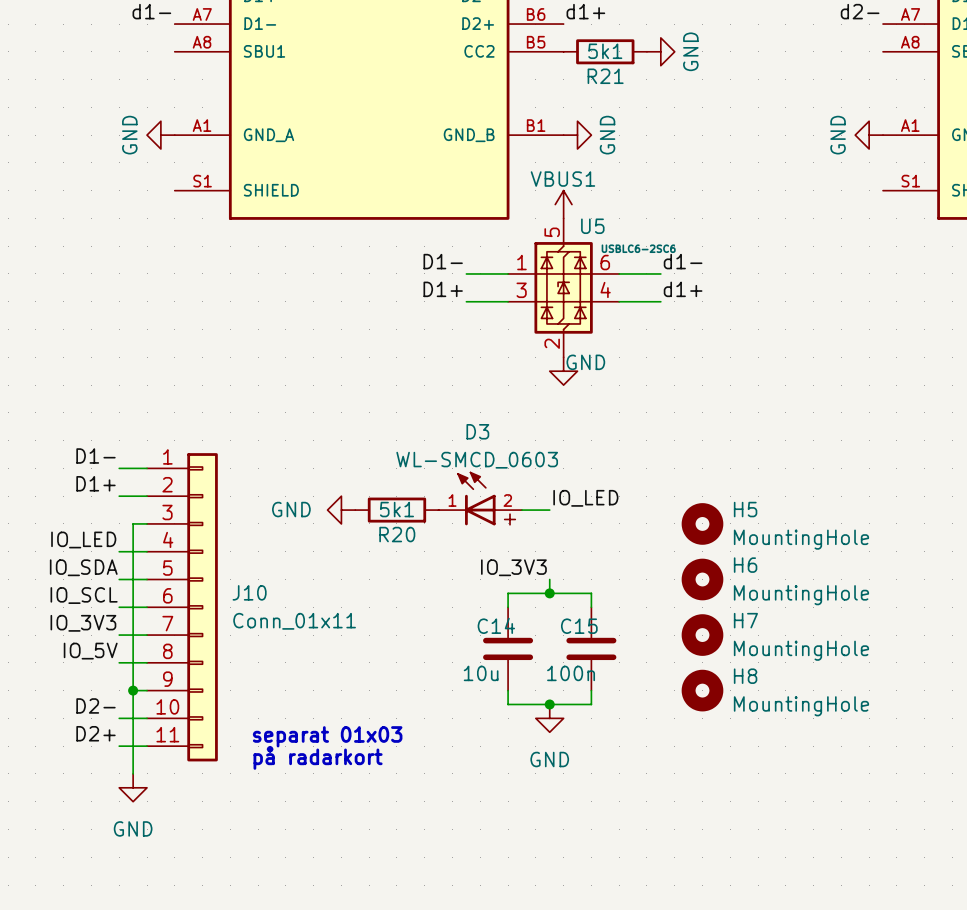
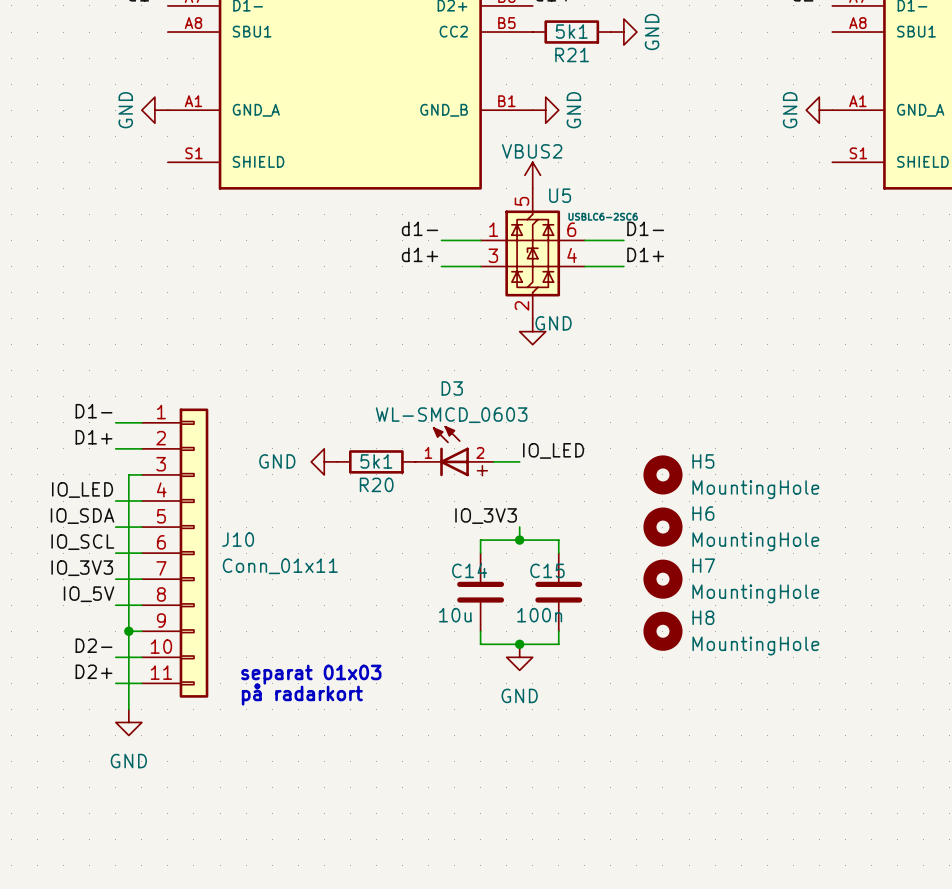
power symbol: VBUS1 (563, 204) -> VBUS2 (532, 175)
label: D1- (443, 261) -> d1- (420, 228)
label: d1- (683, 261) -> D1- (645, 228)
label: D1+ (443, 289) -> d1+ (420, 254)
label: d1+ (683, 289) -> D1+ (645, 254)

